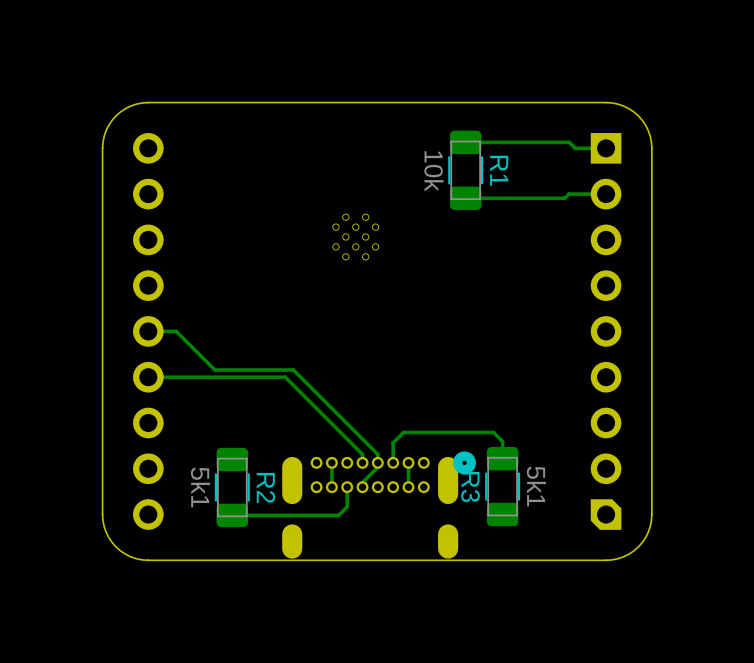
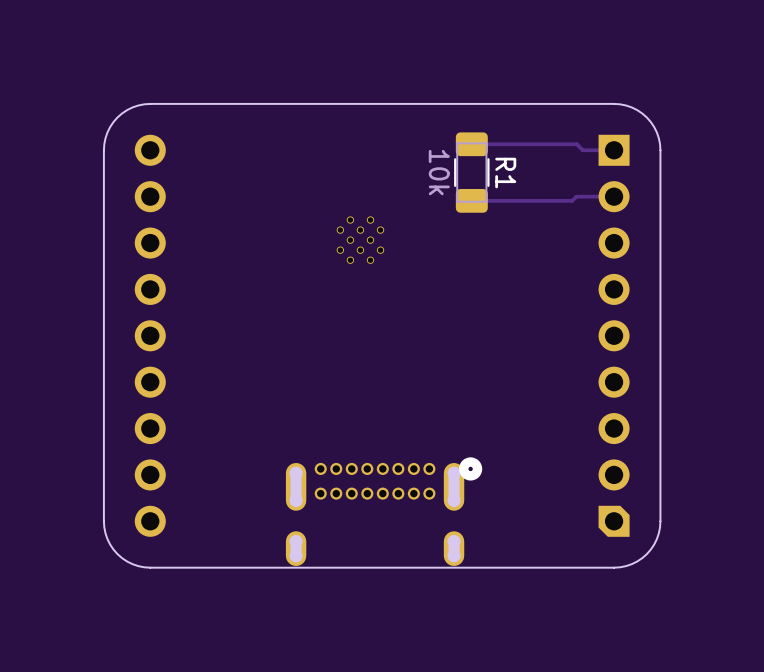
track: (148, 331) (176, 331) (214, 369) (293, 369) (377, 454) (377, 467) (362, 482) (362, 487) -> none
track: (148, 377) (285, 377) (362, 454) (362, 462) -> none
track: (502, 458) (502, 441) (493, 432) (403, 432) (393, 442) (393, 462) -> none
track: (331, 462) (331, 487) -> none
track: (408, 462) (408, 487) -> none
R3: 5k1 (502, 486) -> none
R2: 5k1 (232, 487) -> none
track: (347, 487) (347, 506) (338, 515) (232, 515) -> none

